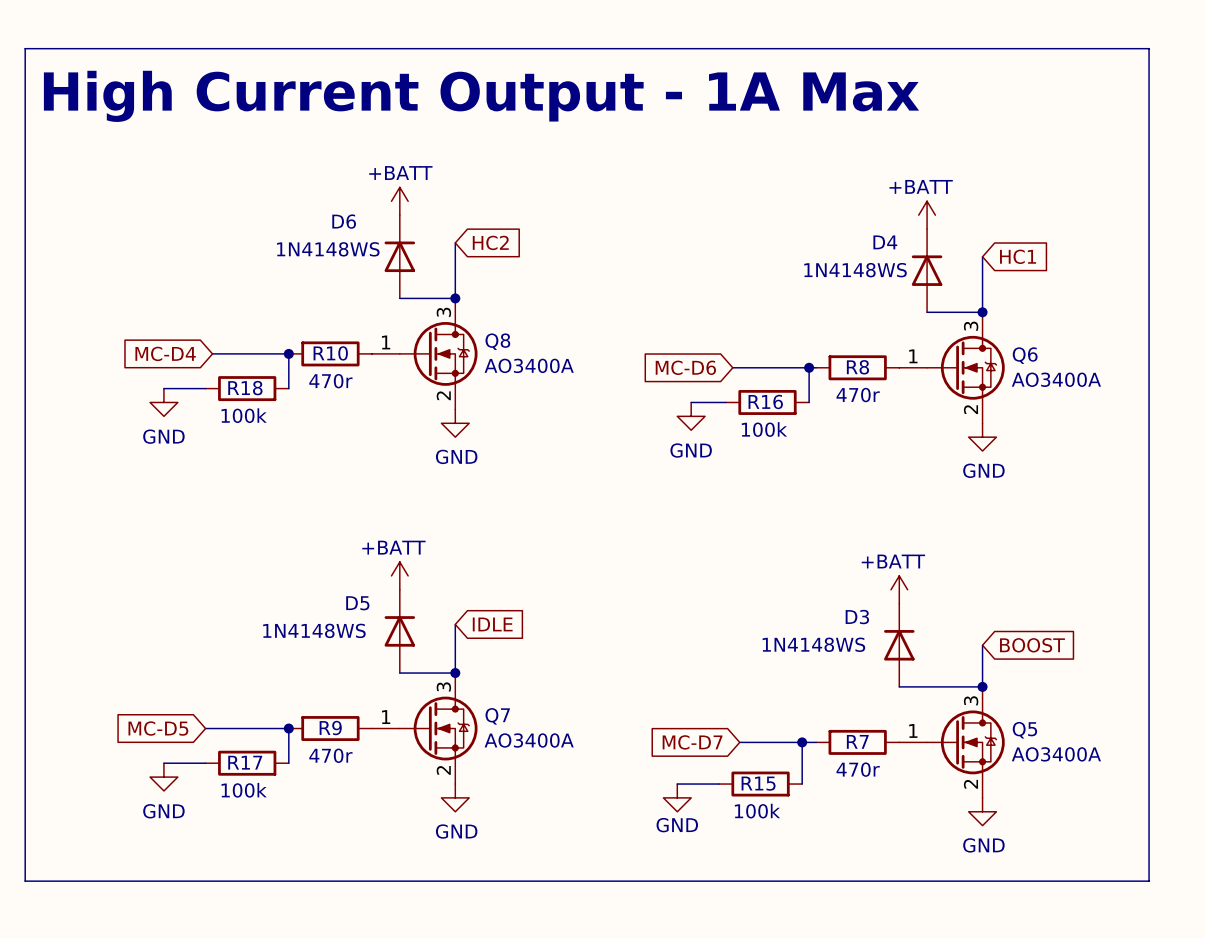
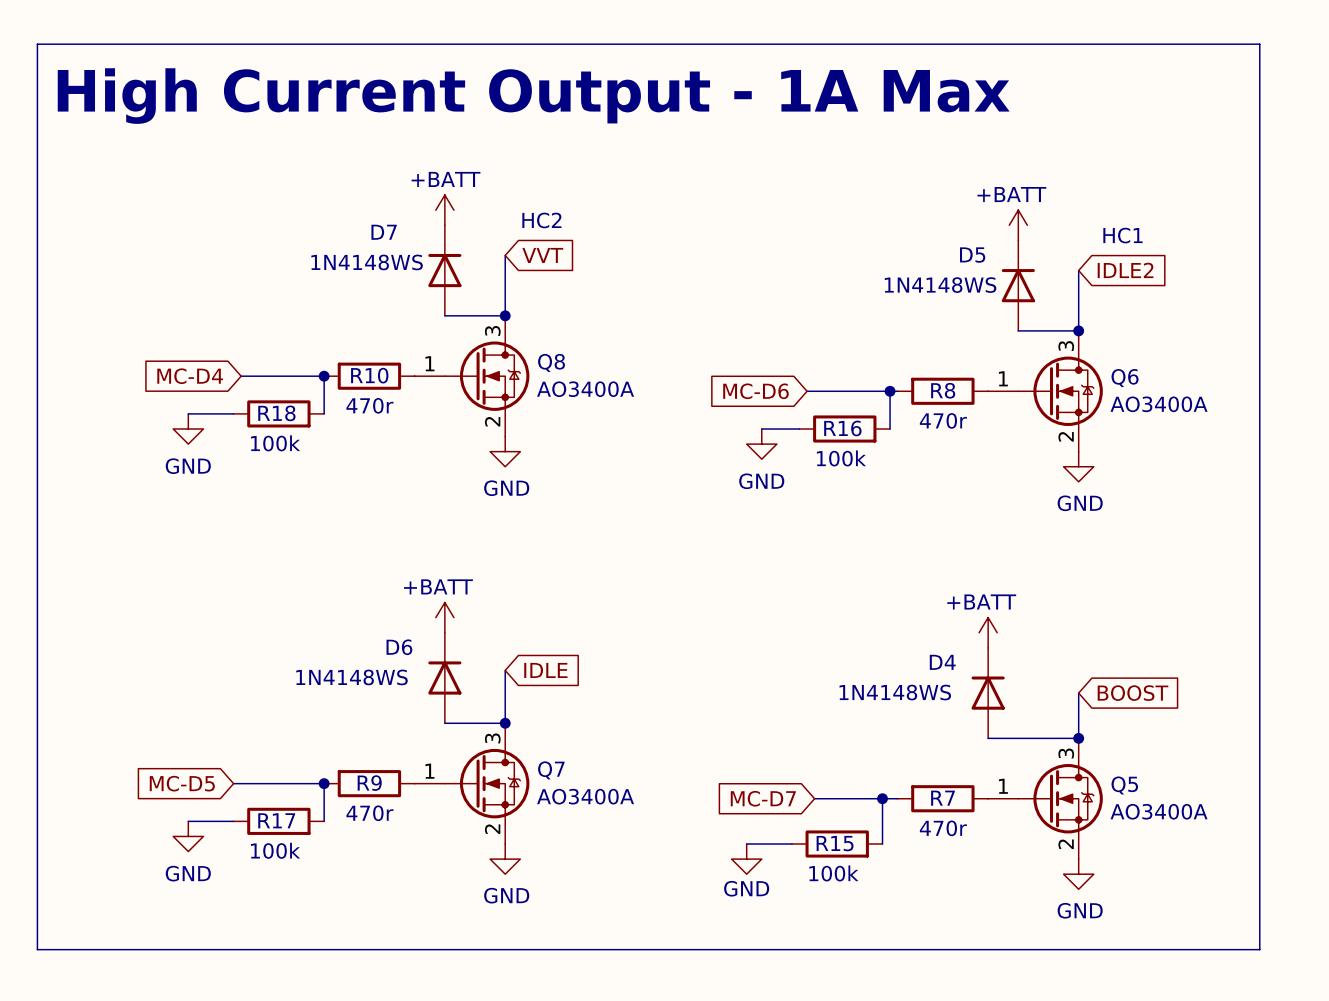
text: none -> HC2 (541, 220)
D6 name: D6 (344, 221) -> D7 (384, 232)
text: none -> HC1 (1122, 235)
global label: HC2 (490, 242) -> VVT (542, 255)
D4 name: D4 (885, 242) -> D5 (972, 255)
global label: HC1 (1018, 256) -> IDLE2 (1125, 270)
D5 name: D5 (357, 603) -> D6 (399, 647)
D3 name: D3 (857, 617) -> D4 (942, 662)

